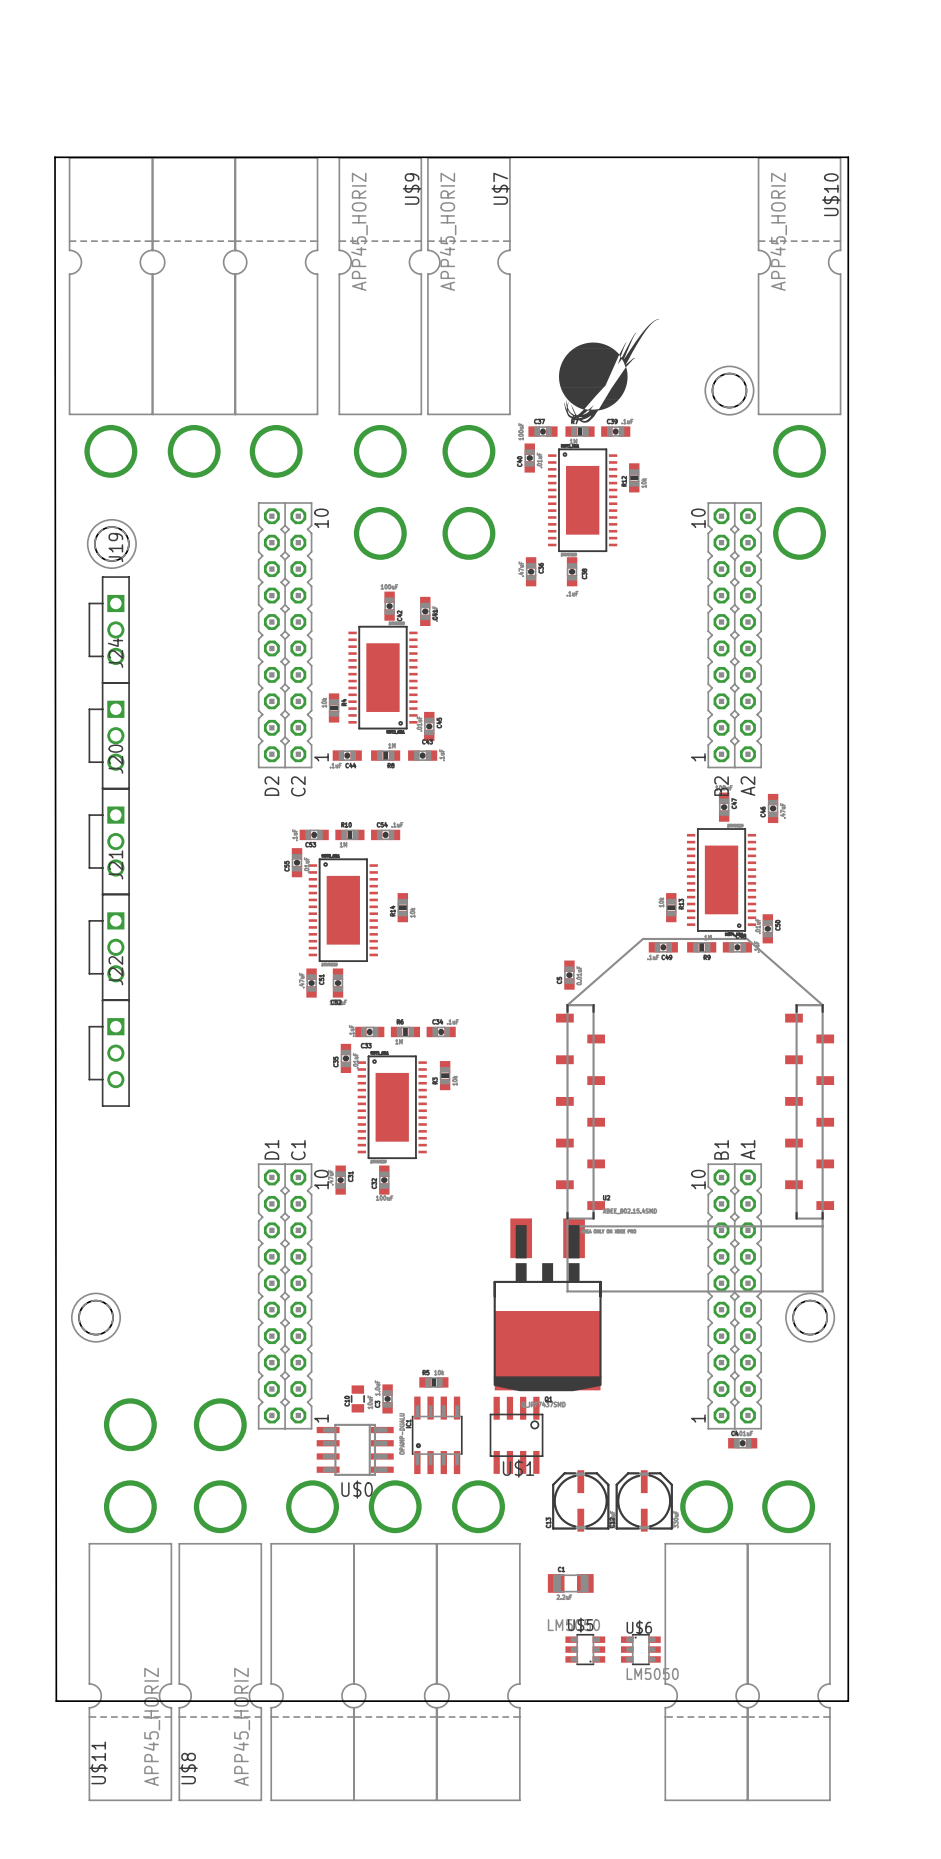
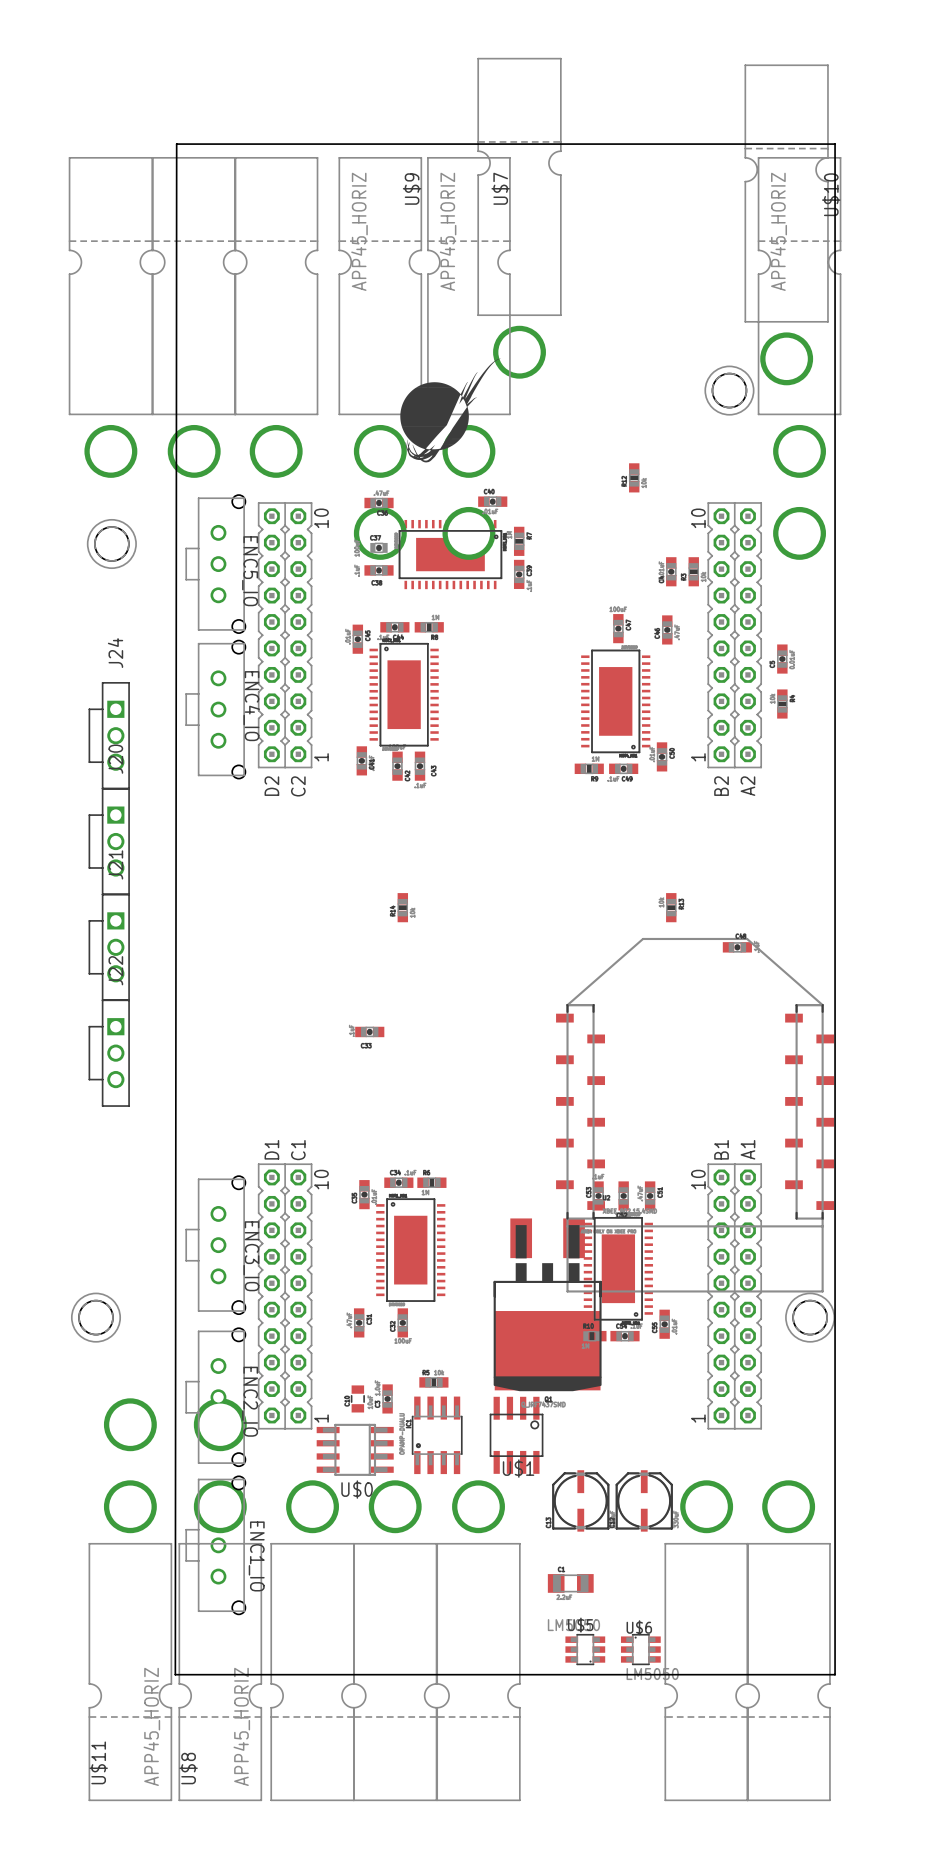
board edge: (55, 157) (848, 157) (848, 1701) (56, 1701) (55, 157) -> (176, 144) (175, 1674) (835, 1674) (835, 144) (176, 144)
part: none -> (519, 218)
part: none -> (786, 224)
drawing position: (609, 370) -> (450, 410)
part position: (542, 431) -> (379, 547)
part rotation: 0° (580, 431) -> 90° clockwise (519, 541)
part position: (580, 431) -> (519, 541)
part rotation: 0° (615, 431) -> 90° clockwise (519, 574)
part position: (615, 431) -> (519, 574)
part rotation: 0° (529, 458) -> 90° clockwise (492, 501)
part position: (529, 458) -> (492, 501)
part rotation: 0° (582, 500) -> 90° clockwise (450, 554)
part position: (582, 500) -> (450, 554)
ENC5_IO: none -> (215, 564)
part rotation: 0° (531, 571) -> 90° clockwise (379, 502)
part position: (531, 571) -> (379, 502)
part rotation: 0° (572, 571) -> 90° clockwise (379, 570)
part position: (572, 571) -> (379, 570)
part position: (389, 606) -> (397, 766)
part position: (425, 611) -> (361, 760)
J19: (109, 629) -> none
part rotation: 0° (382, 677) -> 180° (404, 694)
part position: (334, 707) -> (782, 704)
ENC4_IO: none -> (215, 709)
part position: (429, 726) -> (357, 639)
part position: (347, 755) -> (394, 627)
part position: (385, 755) -> (429, 627)
part rotation: 0° (422, 755) -> 90° clockwise (420, 766)
part position: (724, 807) -> (618, 628)
part position: (773, 808) -> (667, 629)
part rotation: 0° (314, 834) -> 90° clockwise (598, 1195)
part position: (314, 834) -> (598, 1195)
part position: (349, 834) -> (591, 1336)
part position: (385, 834) -> (624, 1336)
part position: (297, 862) -> (664, 1324)
part position: (721, 879) -> (615, 701)
part rotation: 0° (343, 910) -> 180° (618, 1268)
part position: (343, 910) -> (618, 1268)
part position: (767, 928) -> (662, 756)
part position: (663, 947) -> (623, 768)
part position: (701, 947) -> (589, 768)
part position: (569, 975) -> (782, 659)
part position: (311, 983) -> (650, 1195)
part position: (338, 983) -> (623, 1195)
part position: (405, 1031) -> (431, 1182)
part position: (441, 1031) -> (398, 1182)
part position: (345, 1058) -> (364, 1194)
part position: (445, 1075) -> (693, 571)
part position: (392, 1107) -> (410, 1250)
part position: (340, 1180) -> (359, 1322)
part position: (384, 1180) -> (402, 1322)
ENC3_IO: none -> (215, 1245)
ENC2_IO: none -> (215, 1397)
part rotation: 0° (742, 1443) -> 90° clockwise (671, 571)
part position: (742, 1443) -> (671, 571)
ENC1_IO: none -> (215, 1545)

